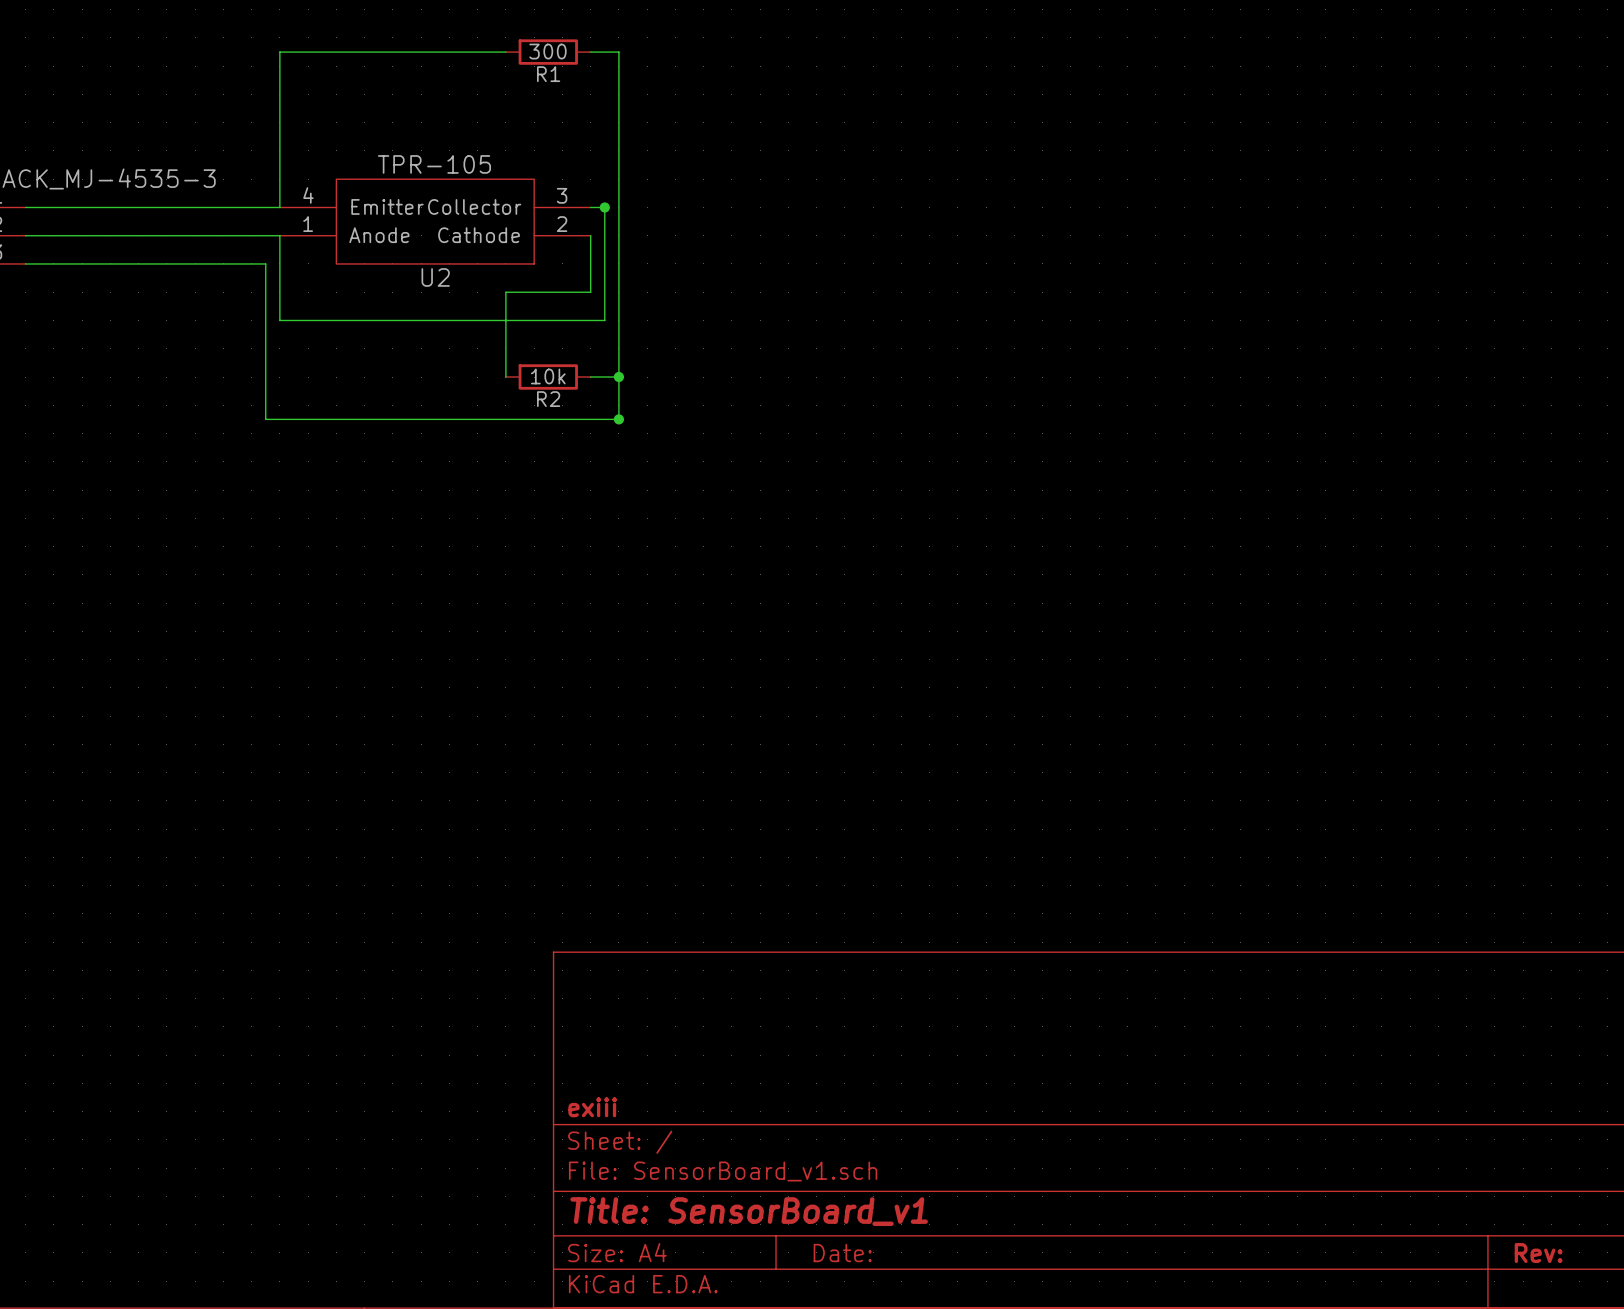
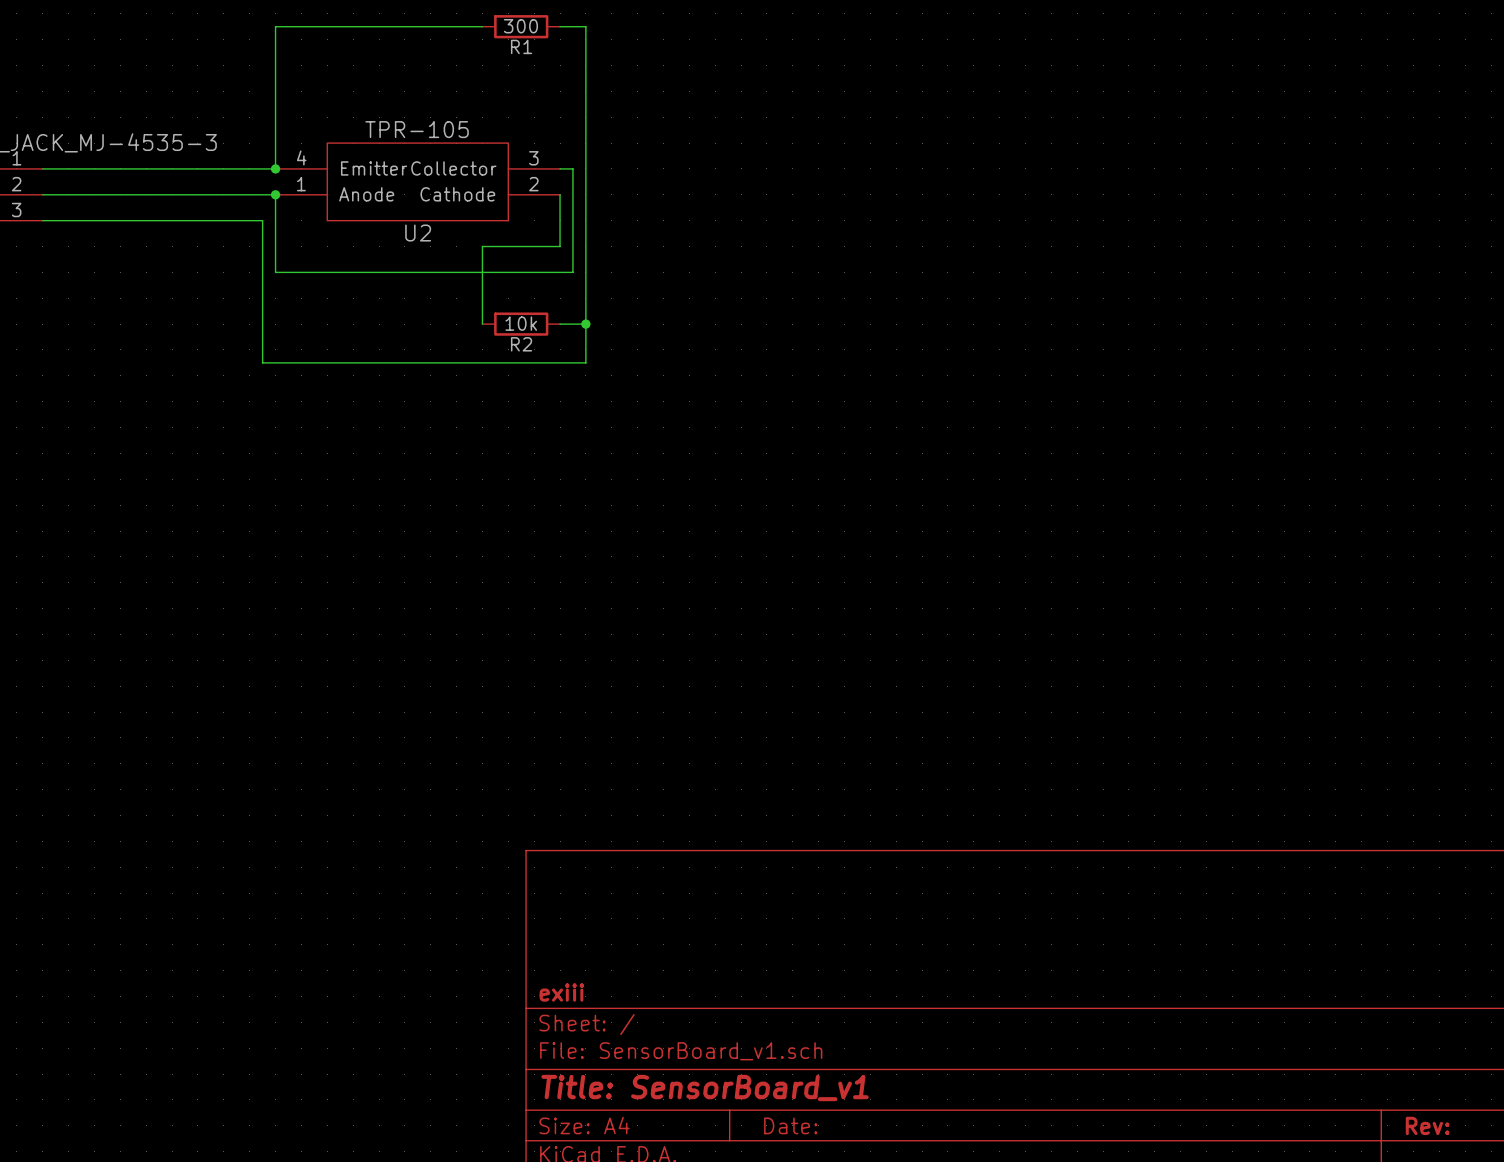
junction: none -> (275, 168)
junction: (604, 207) -> none
junction: none -> (275, 194)
junction: (618, 419) -> none

